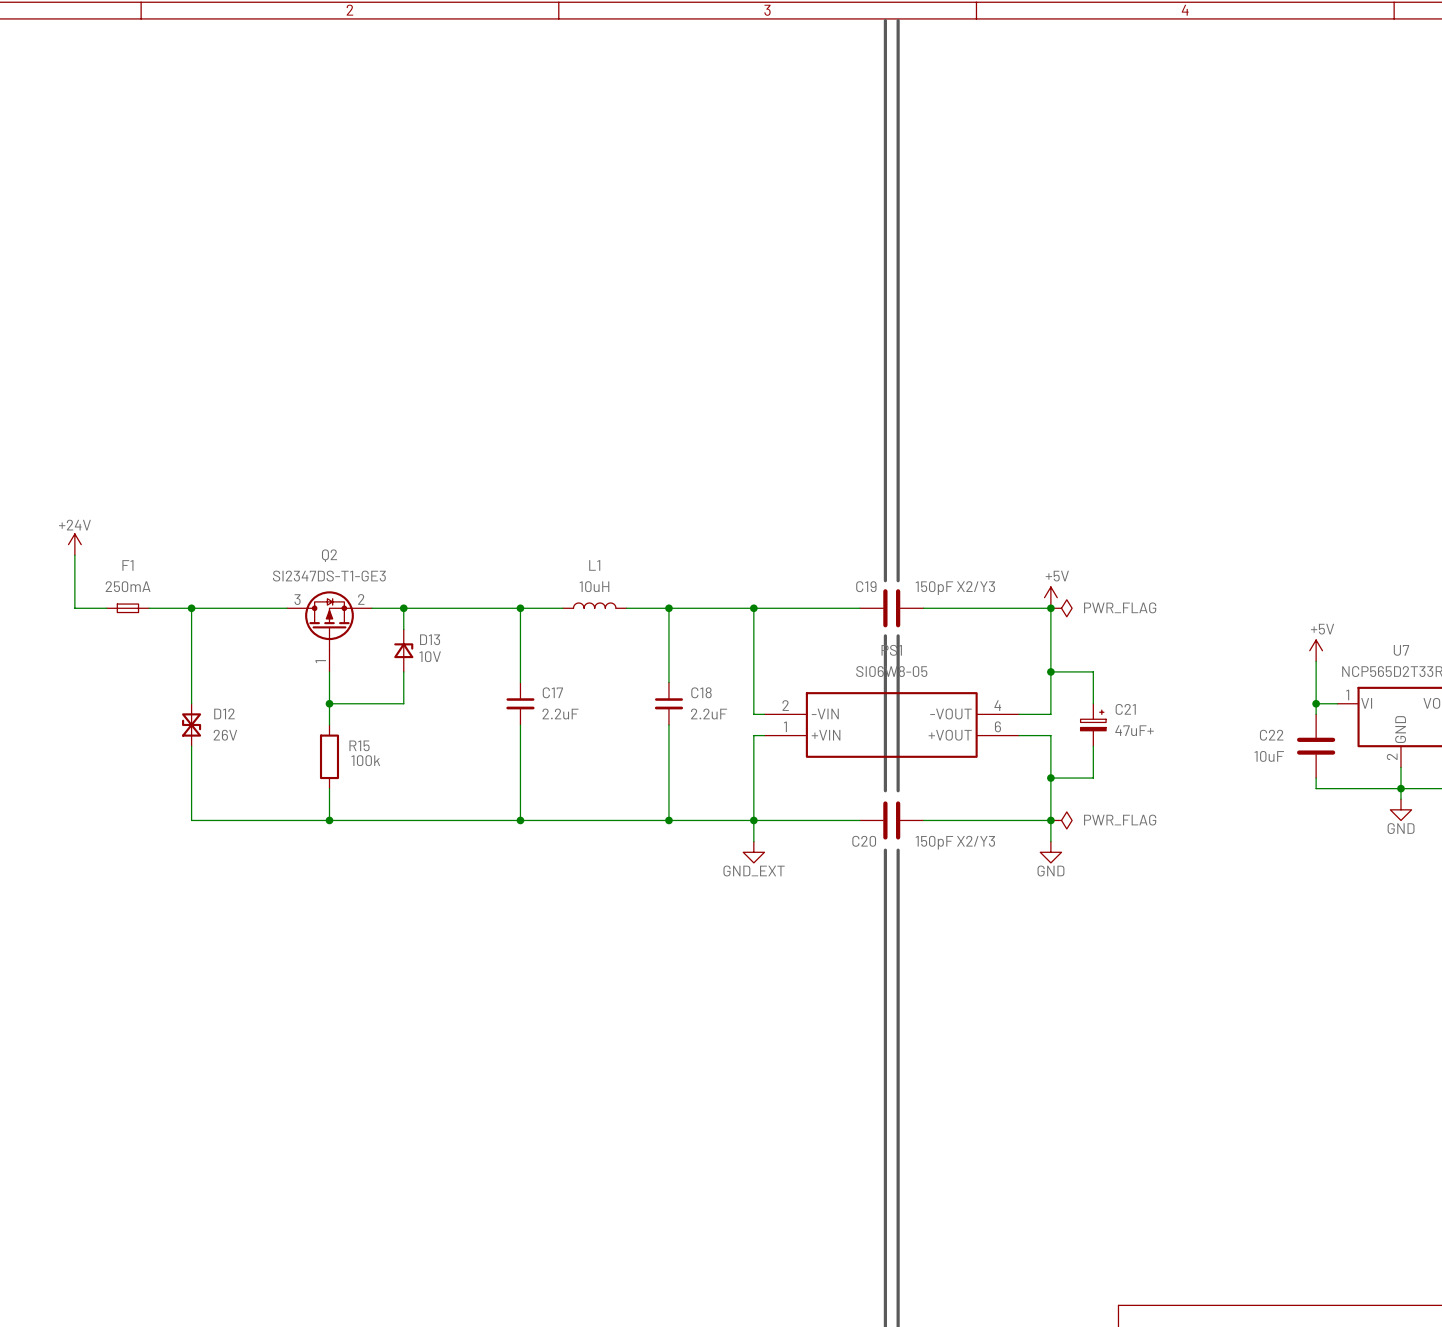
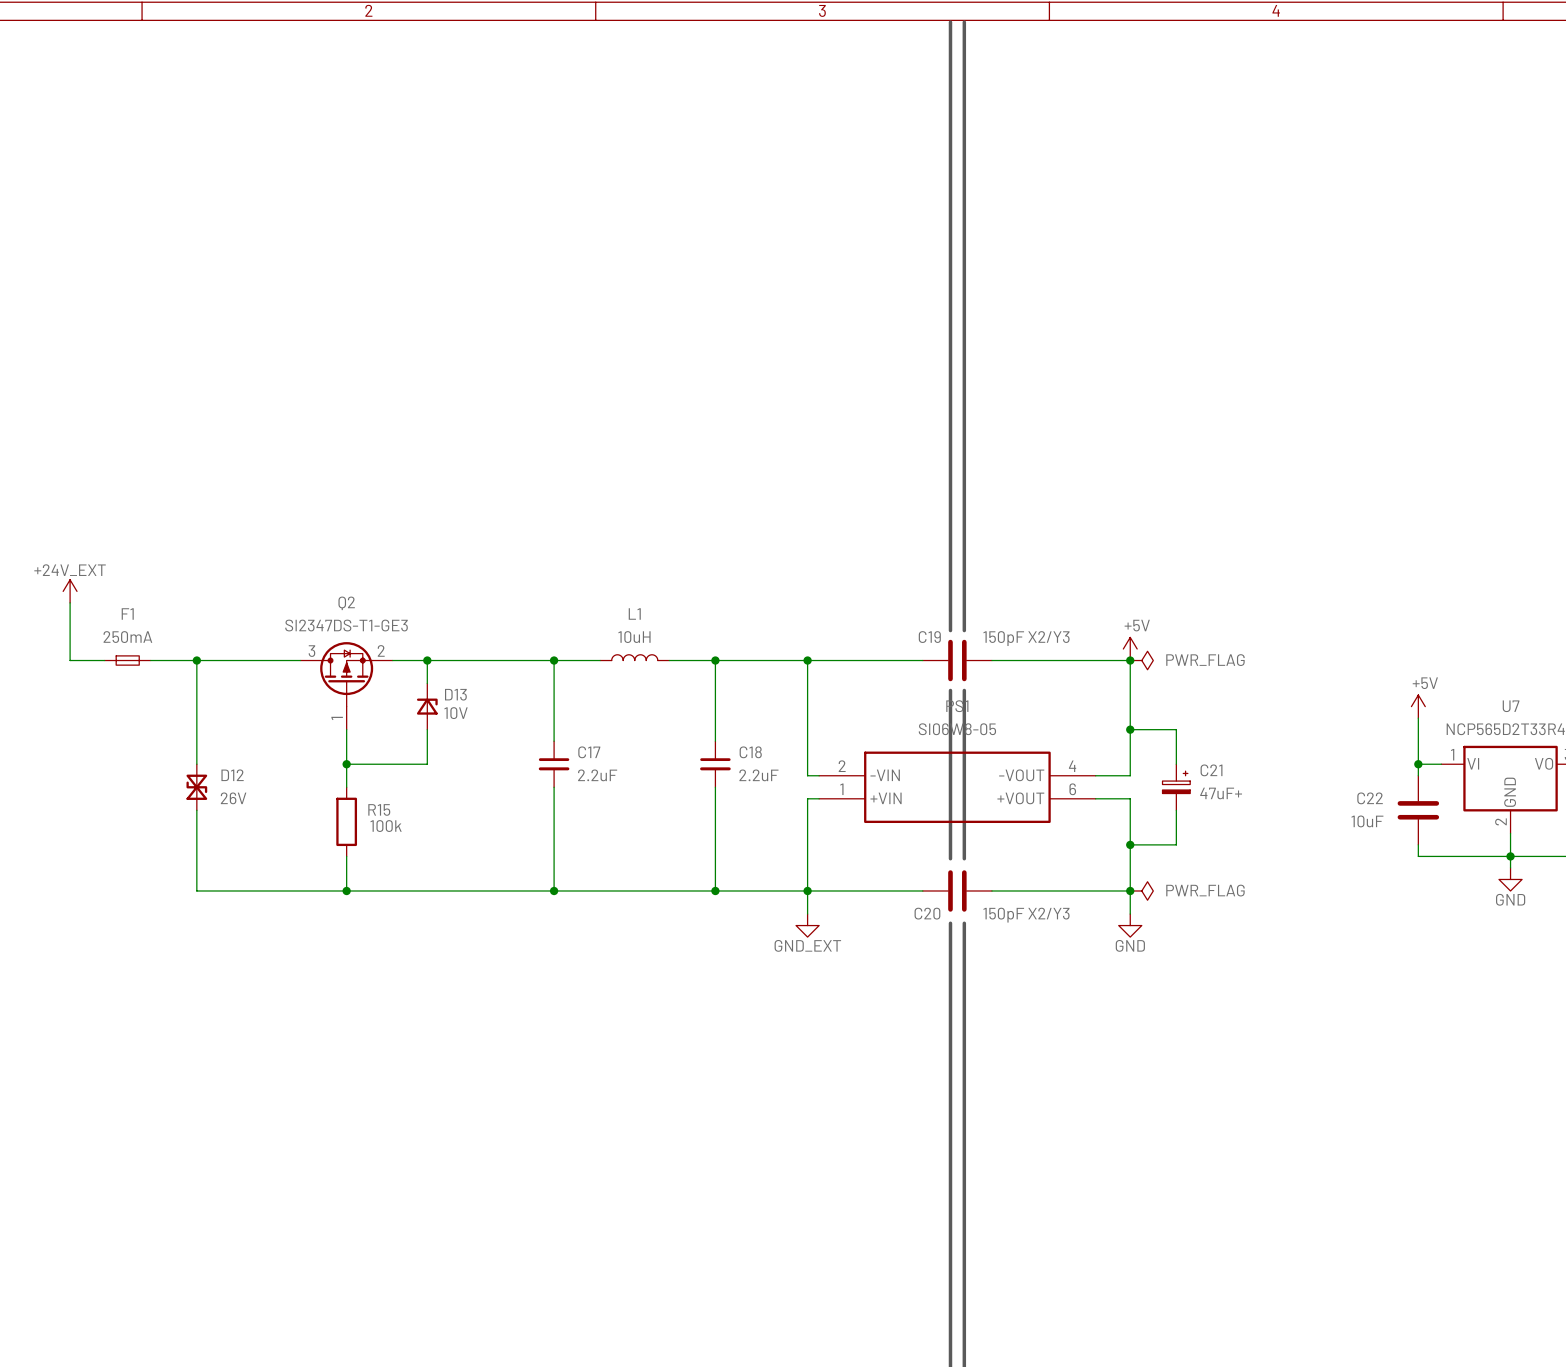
power symbol: +24V (74, 544) -> +24V_EXT (70, 591)

